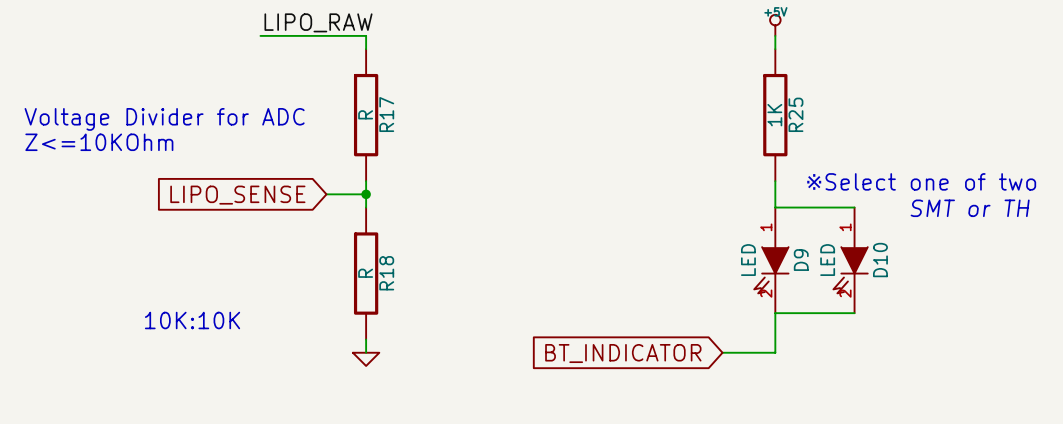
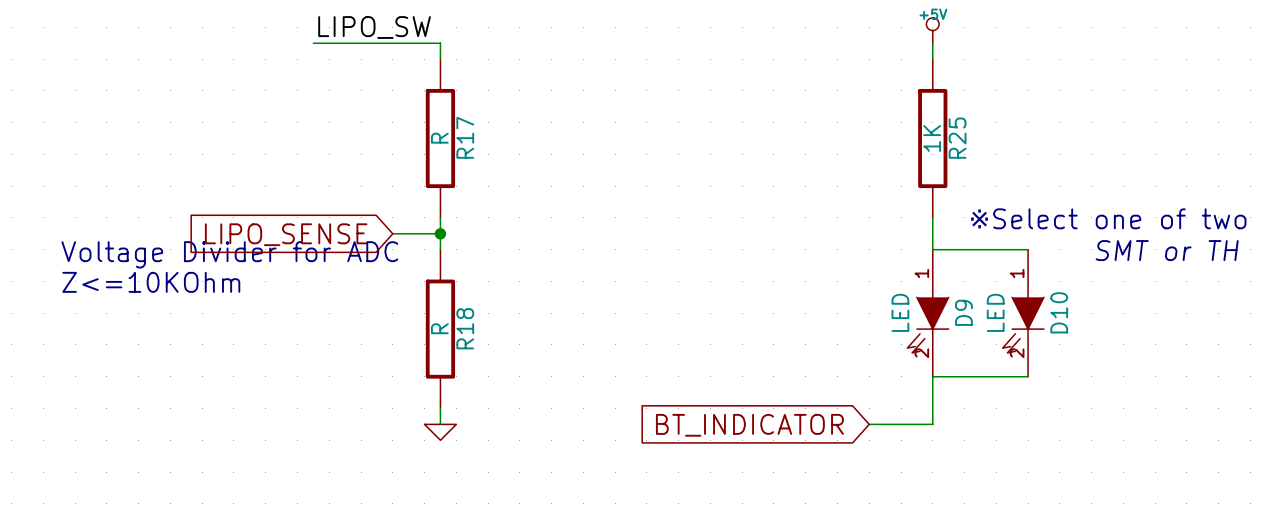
label: LIPO_RAW (318, 22) -> LIPO_SW (374, 27)
text position: Voltage Divider for ADC (164, 119) -> Voltage Divider for ADC (229, 254)
text position: Z<=10KOhm (99, 142) -> Z<=10KOhm (151, 282)
text: 10K:10K (192, 320) -> none

